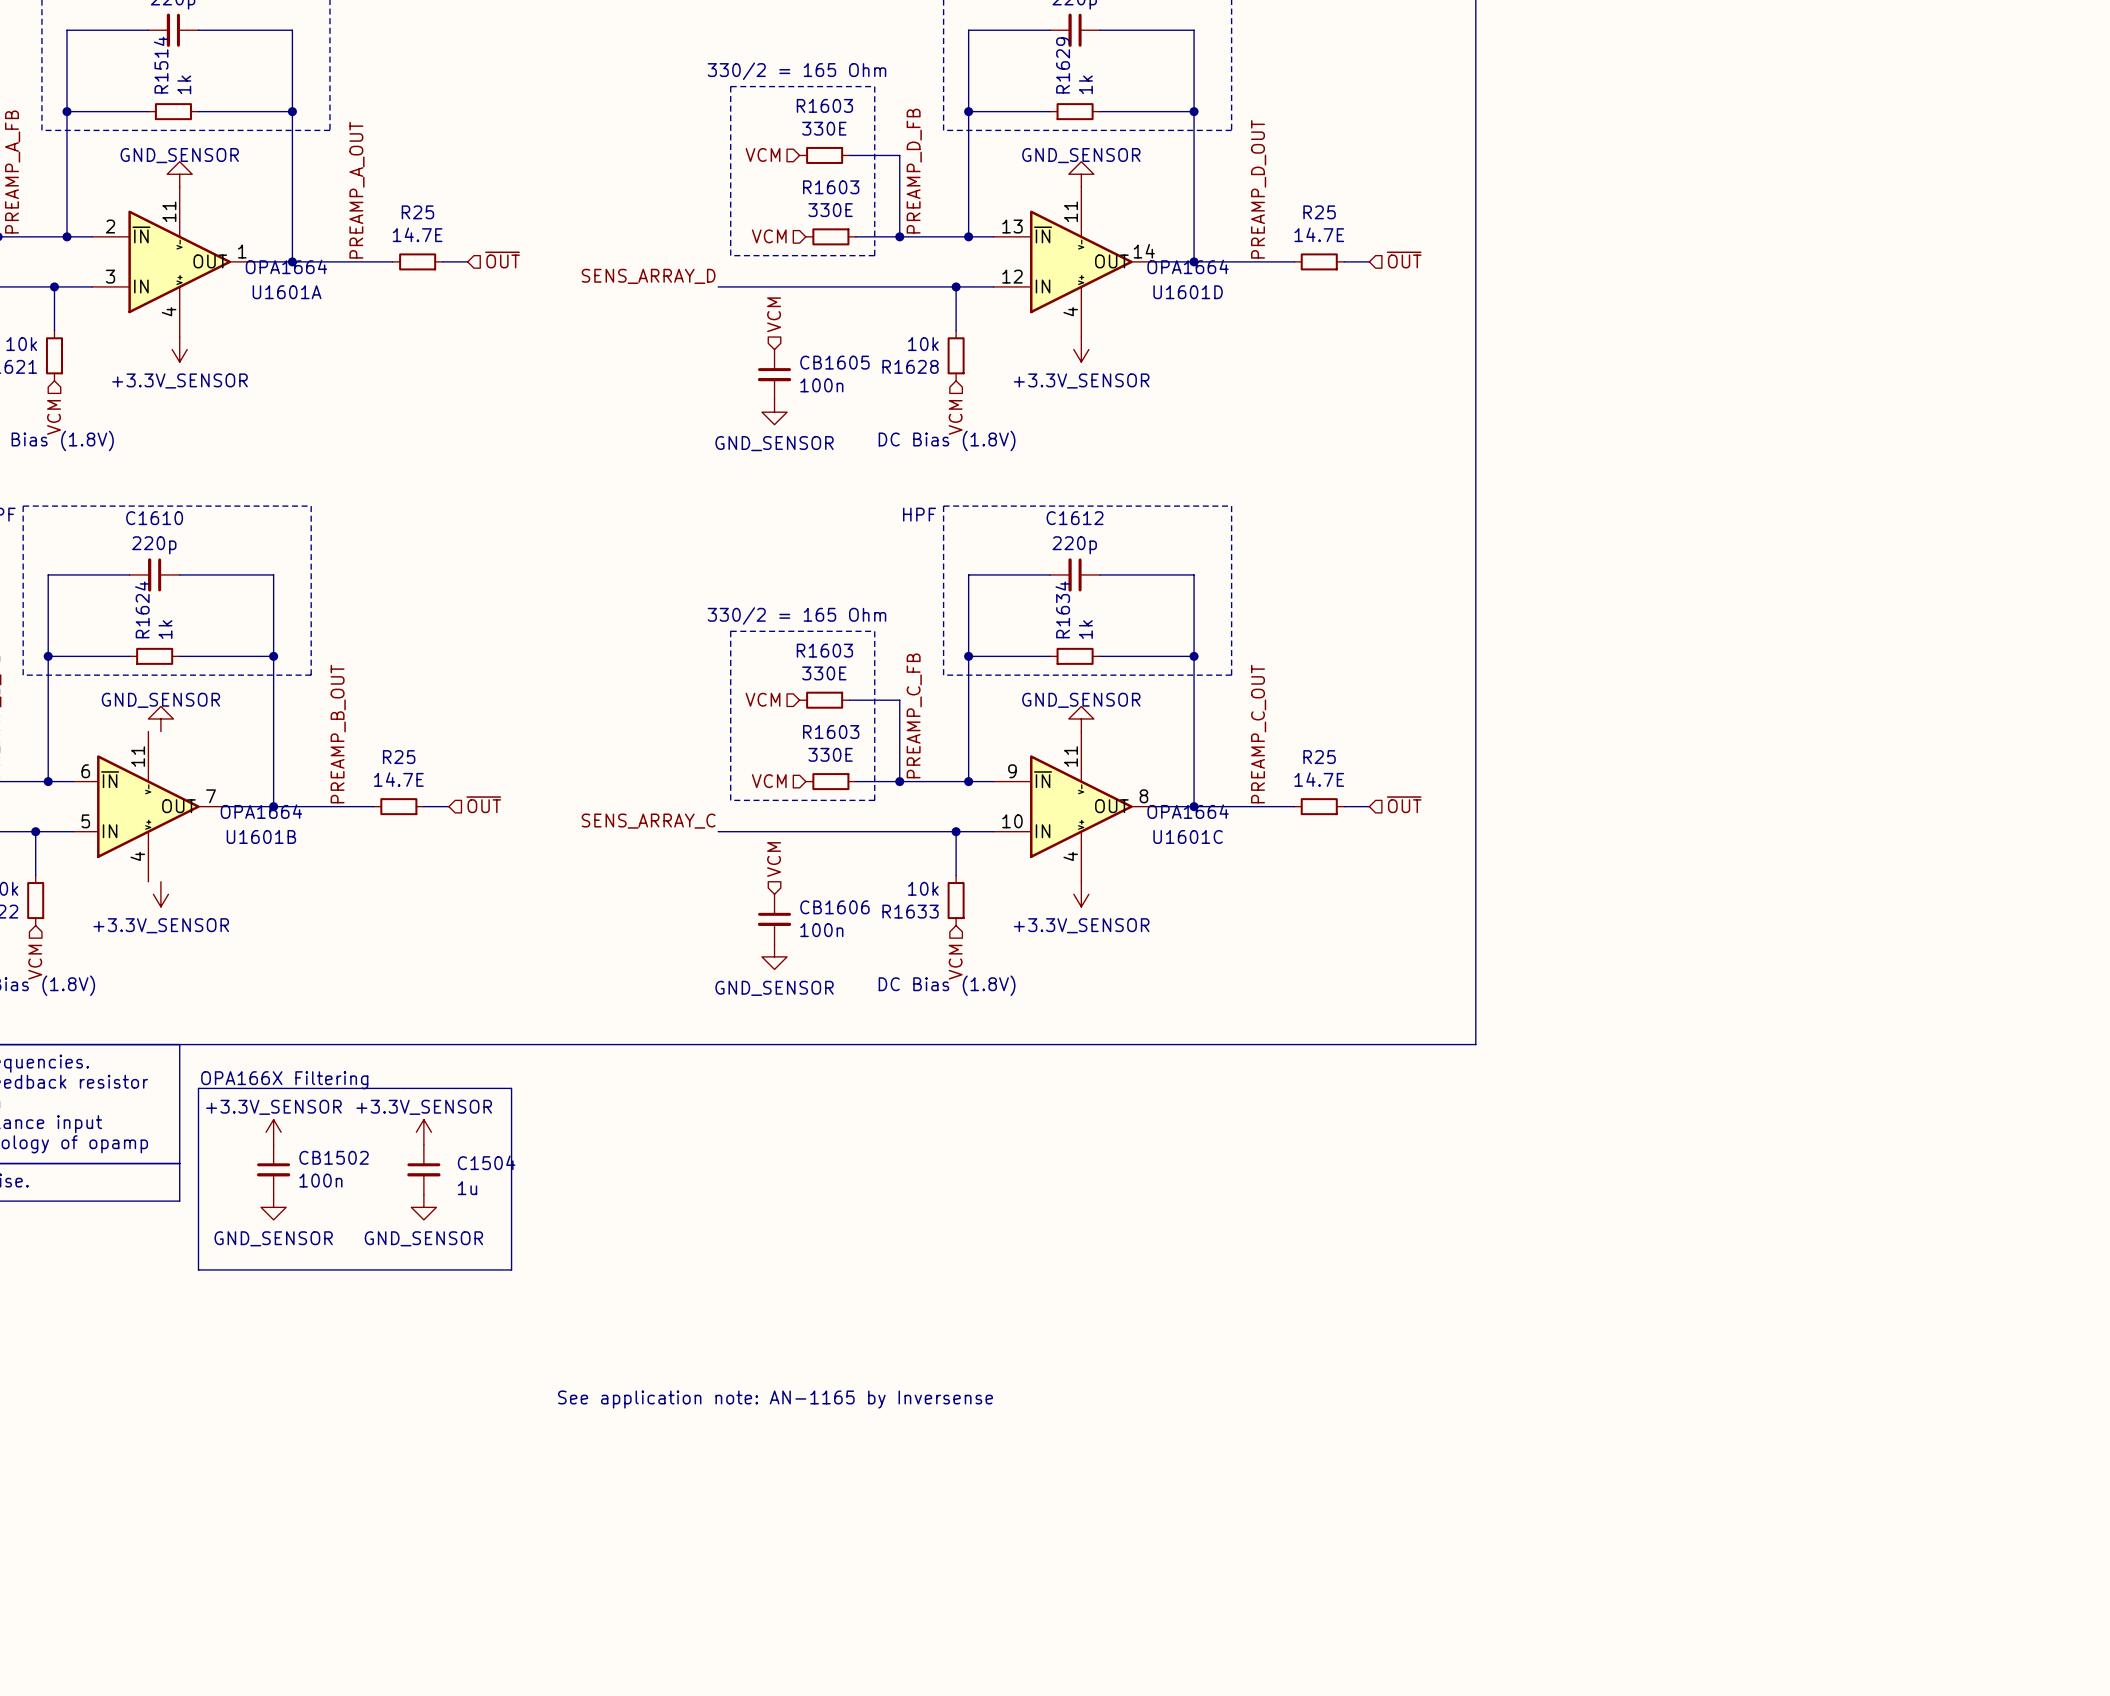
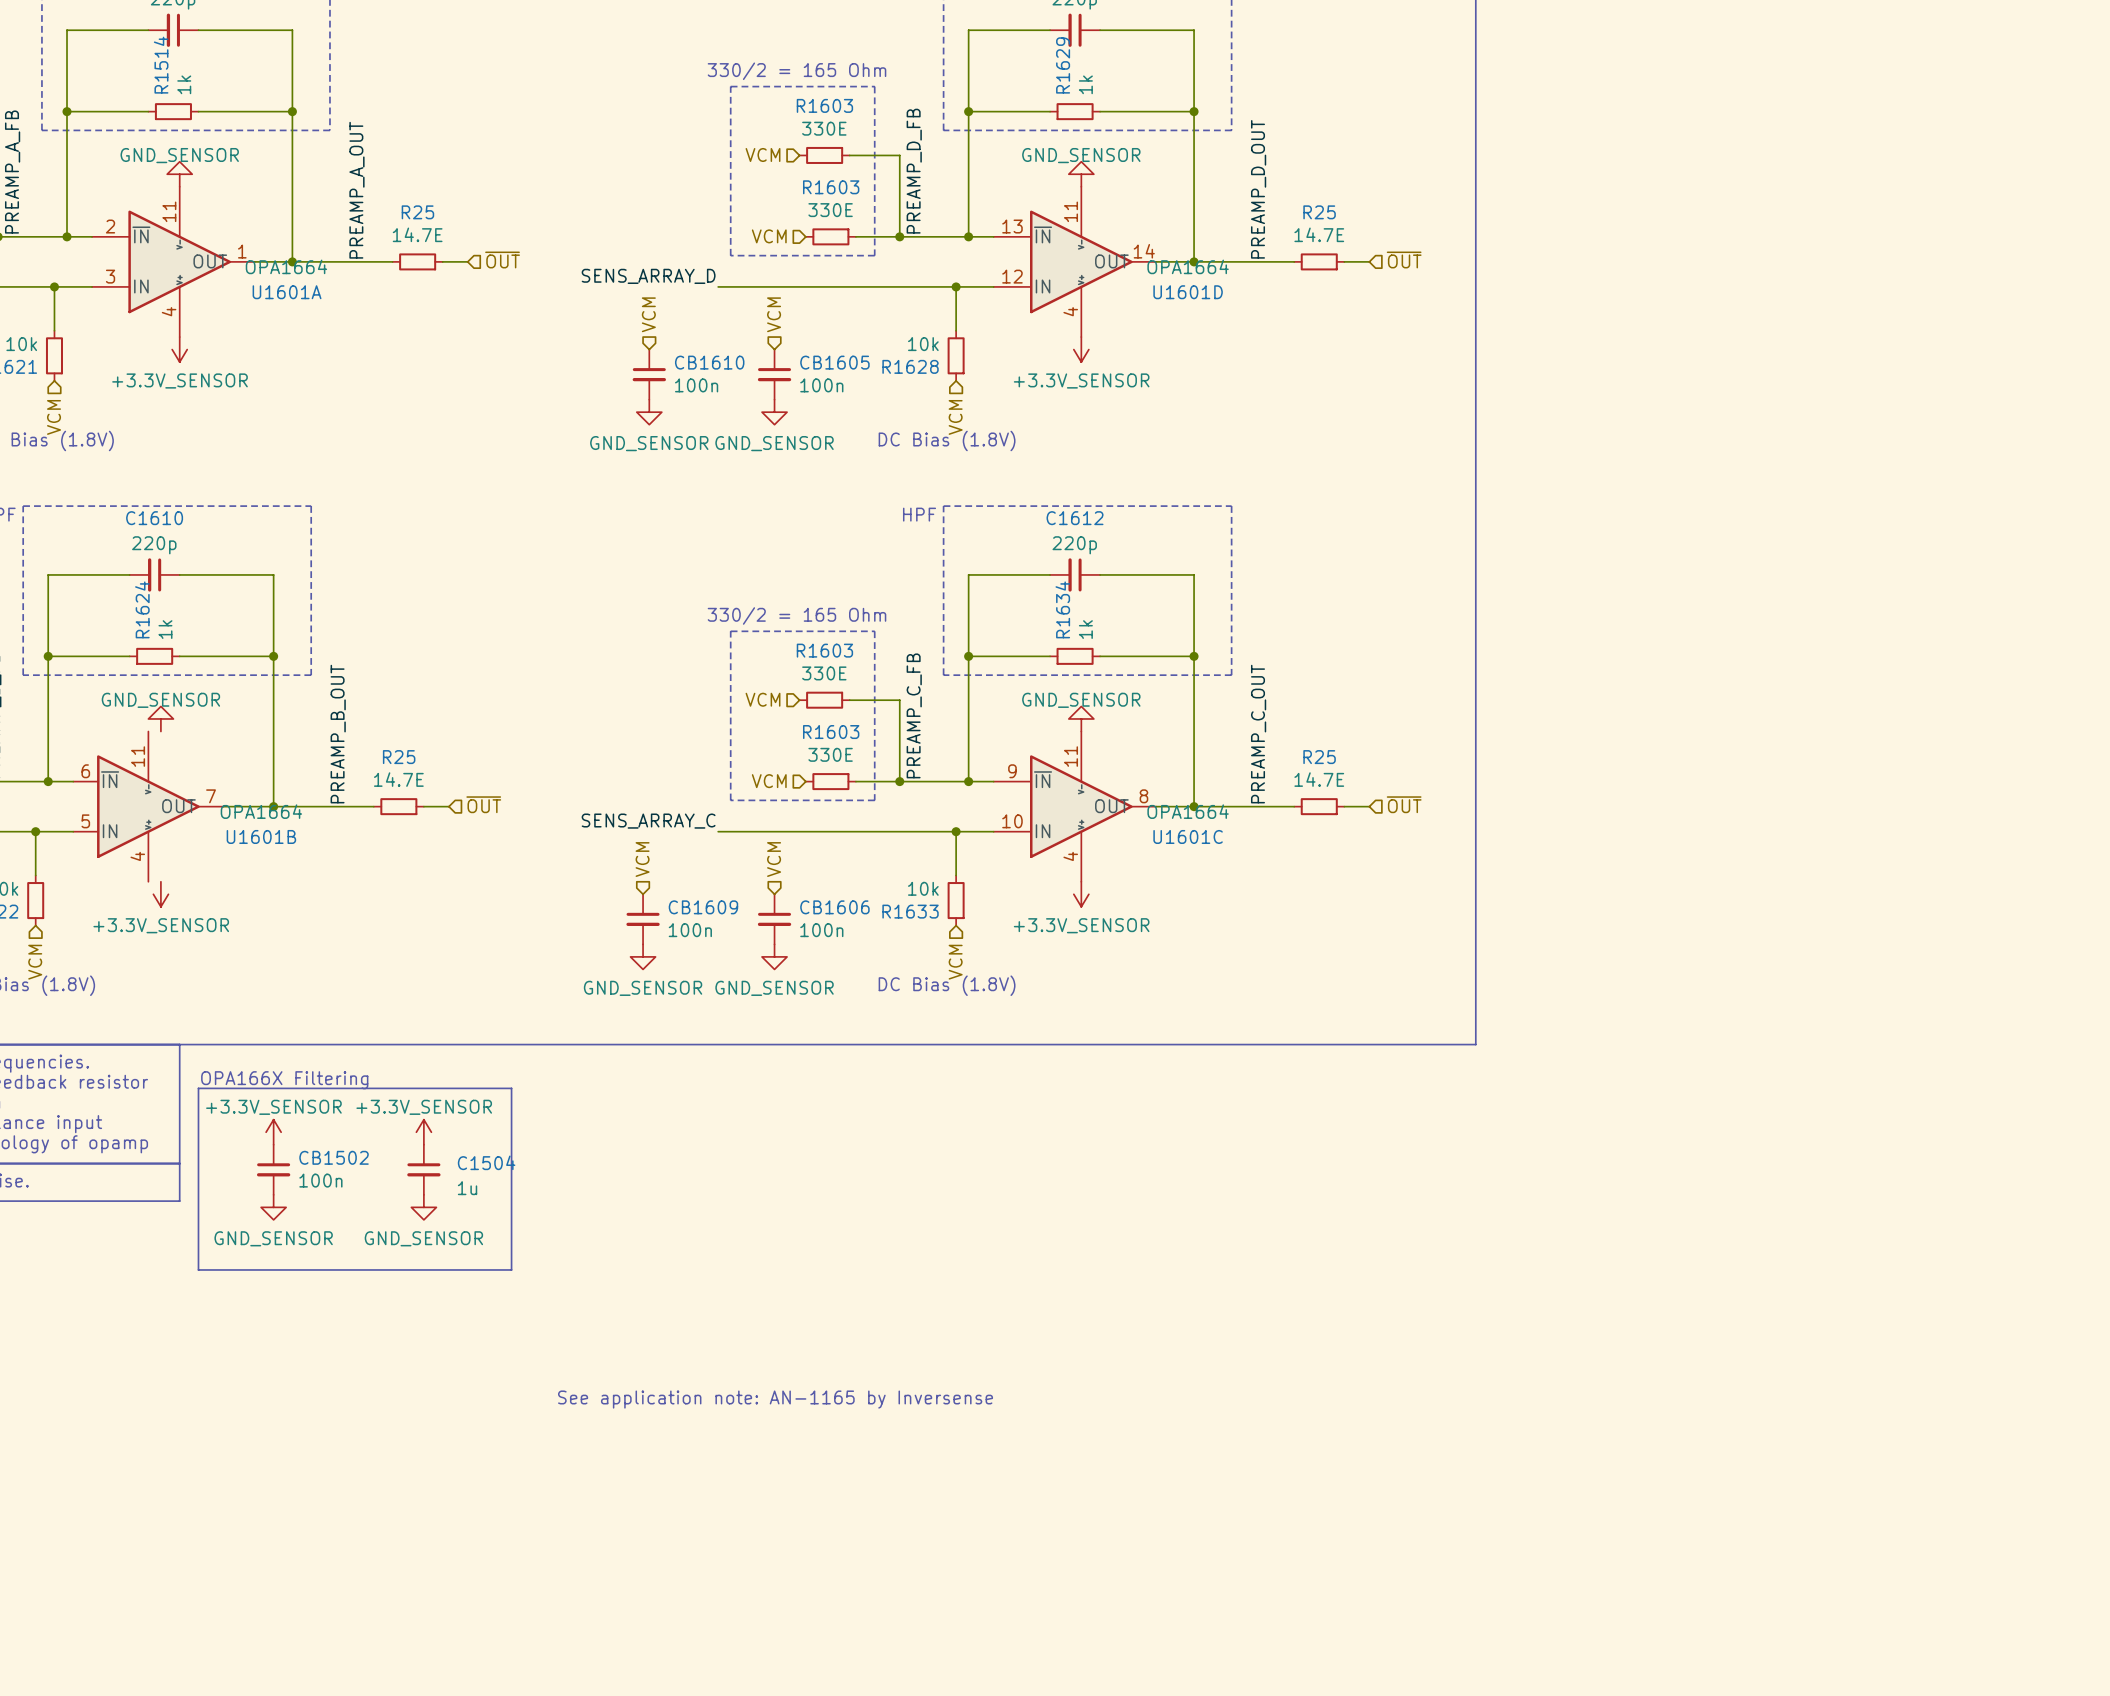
hierarchical label: none -> VCM (648, 314)
CB1610: none -> 100n (649, 374)
power symbol: none -> GND_SENSOR (649, 412)
hierarchical label: none -> VCM (642, 859)
CB1609: none -> 100n (643, 919)
power symbol: none -> GND_SENSOR (643, 956)

